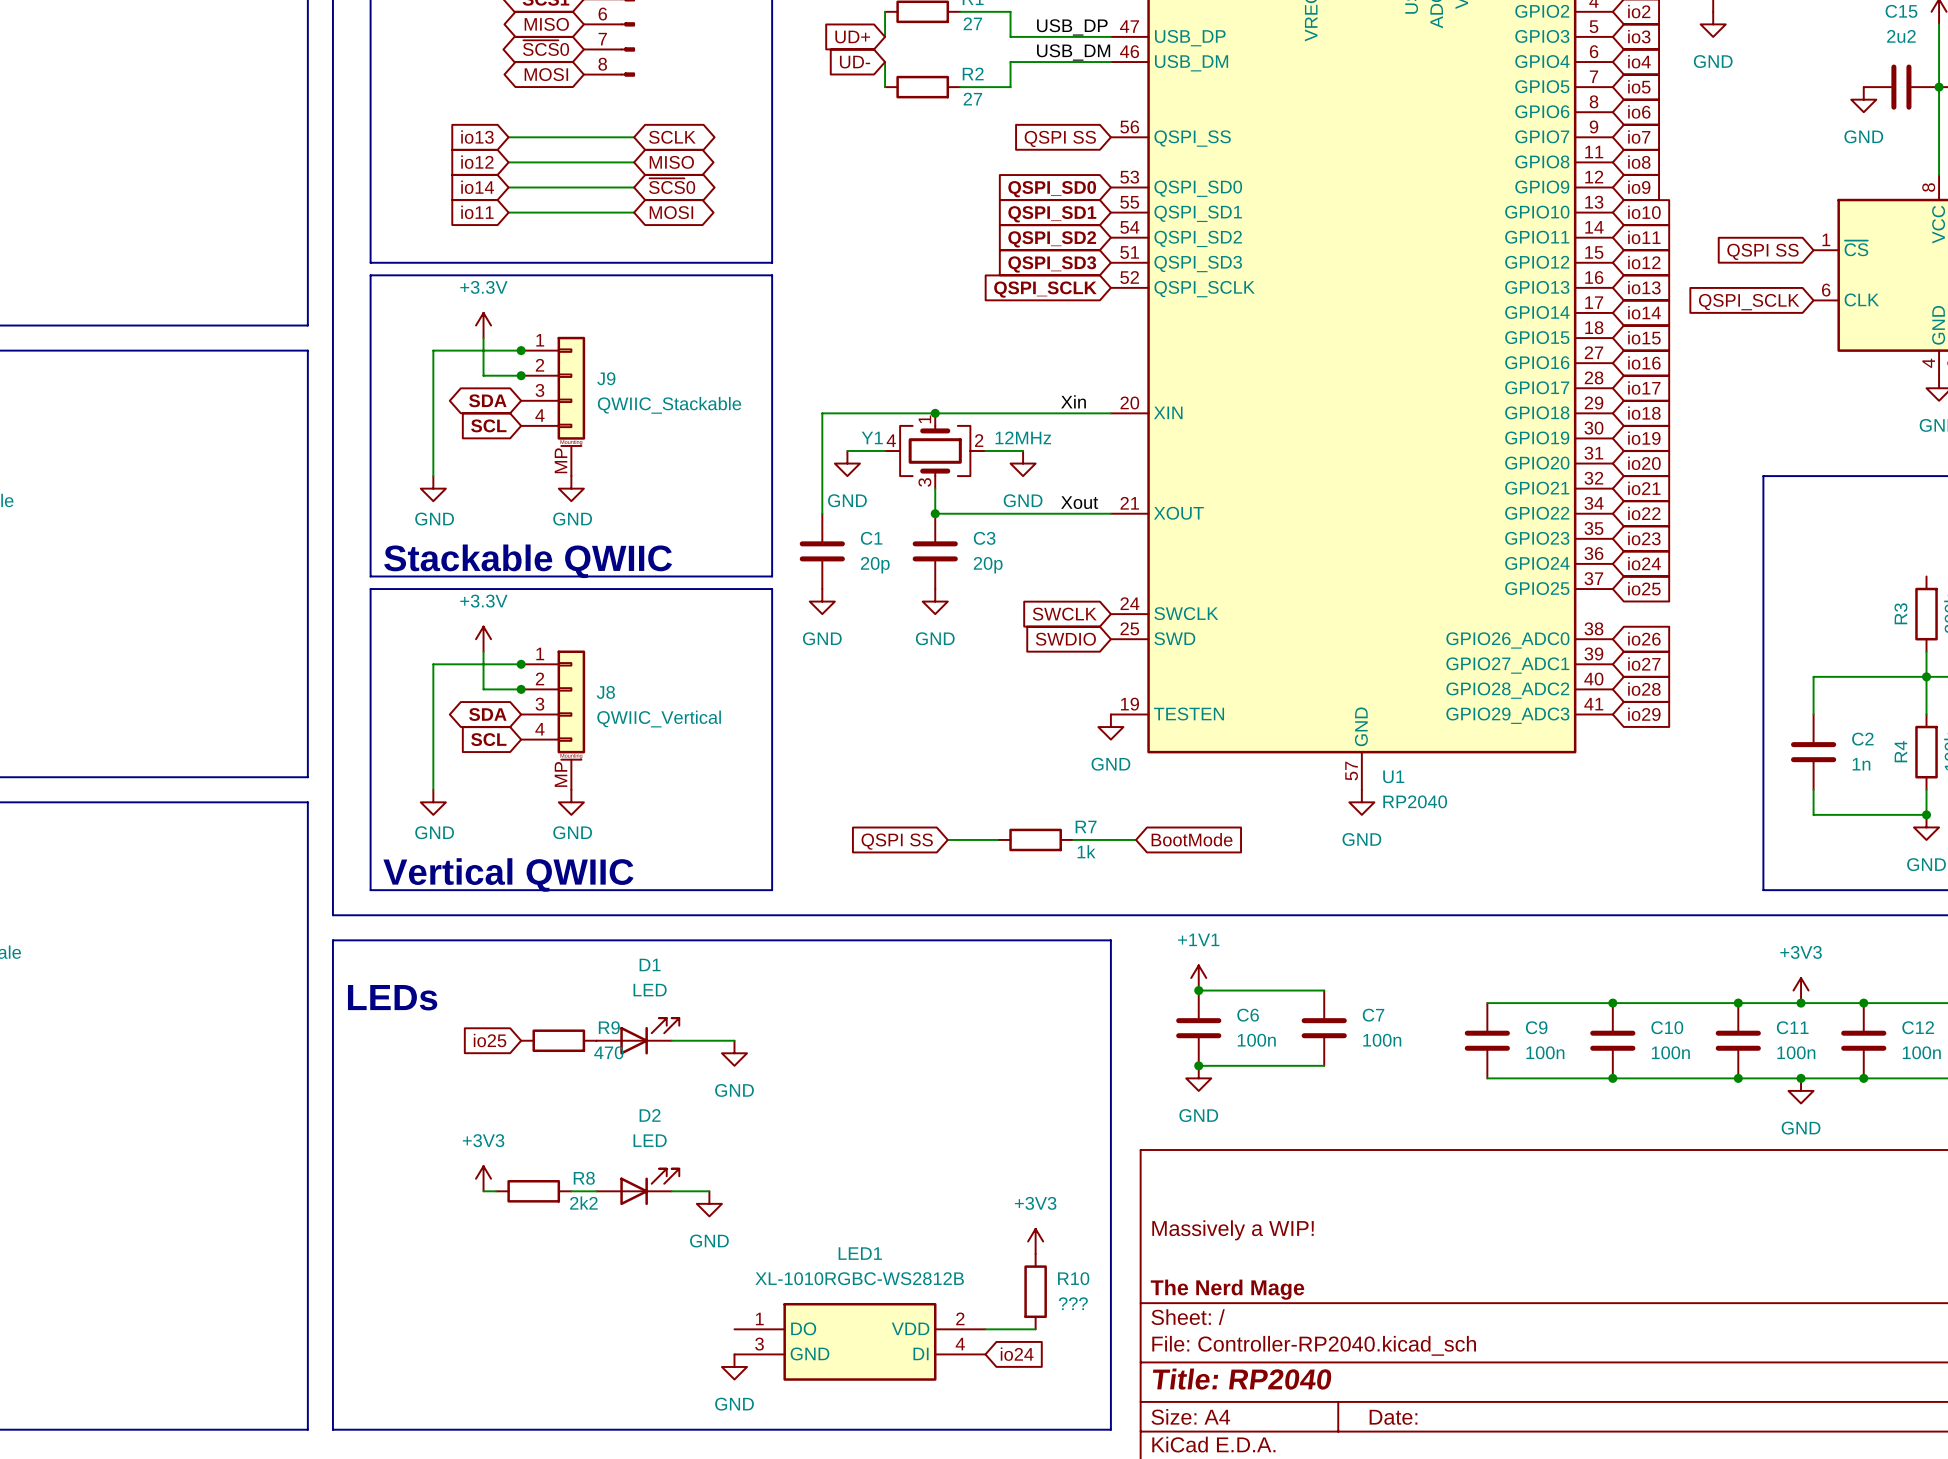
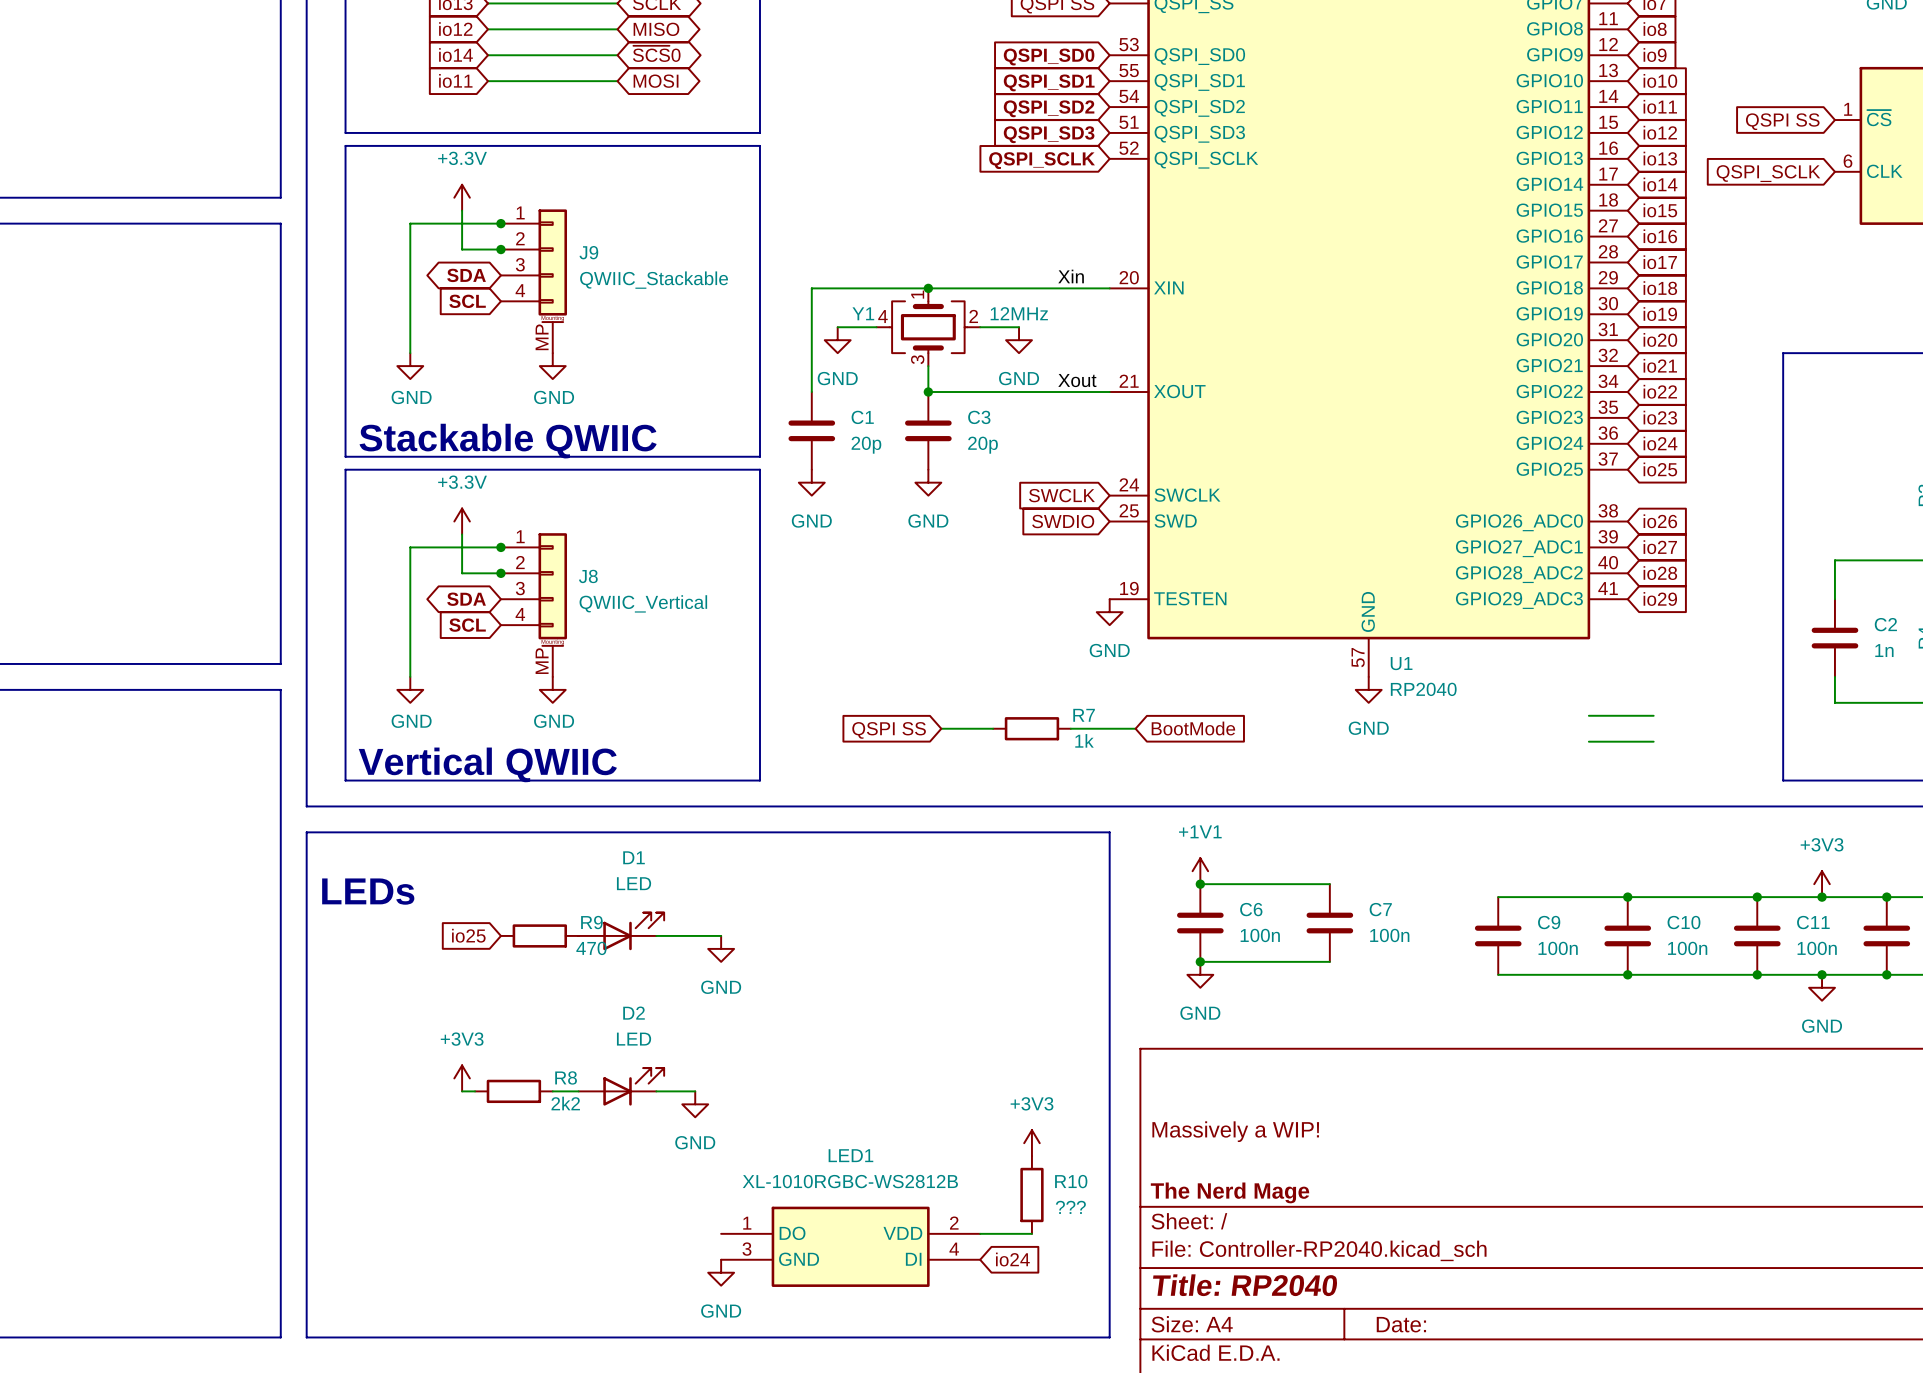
wire: none -> (1588, 715) (1653, 715)
wire: none -> (1588, 741) (1653, 741)

